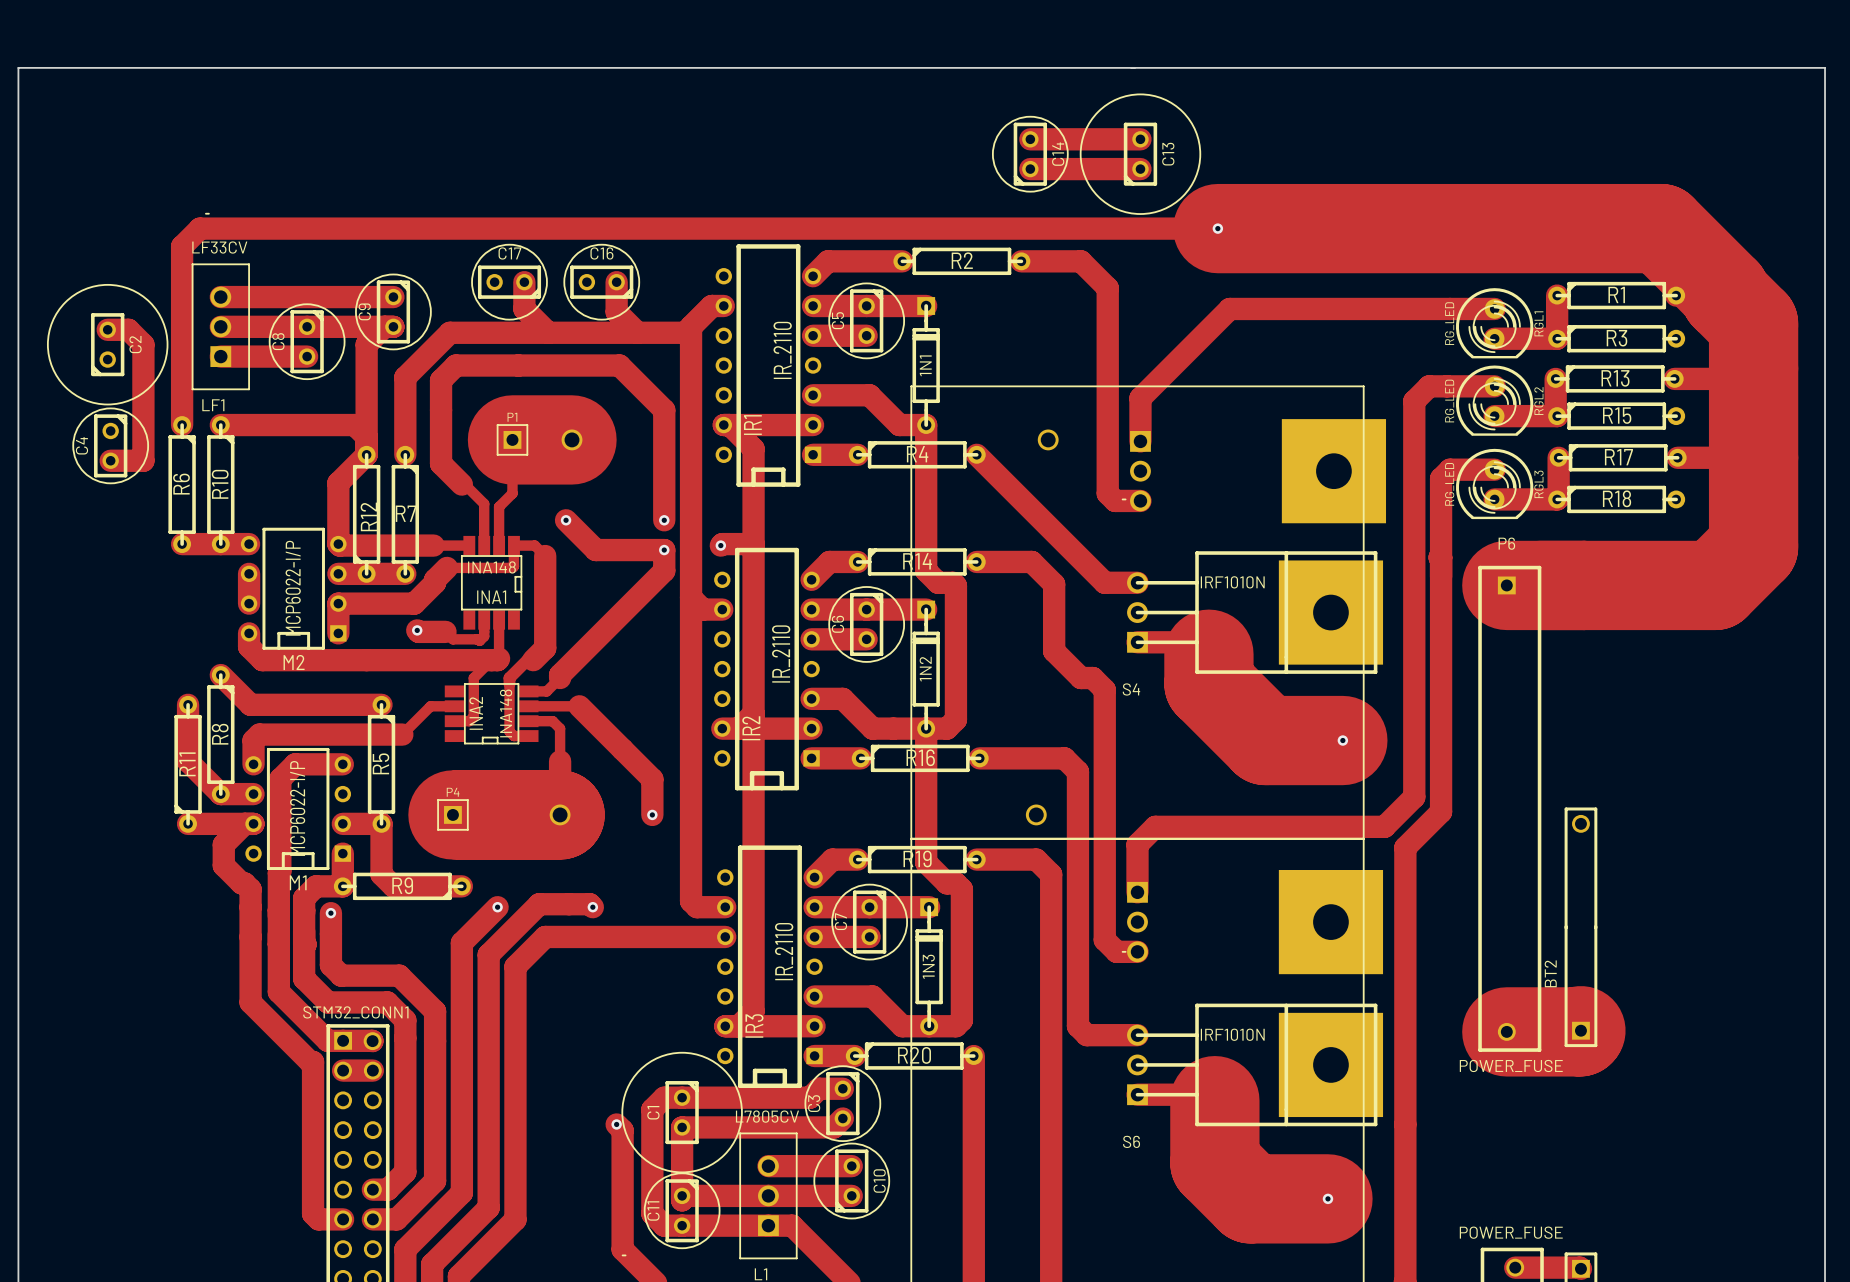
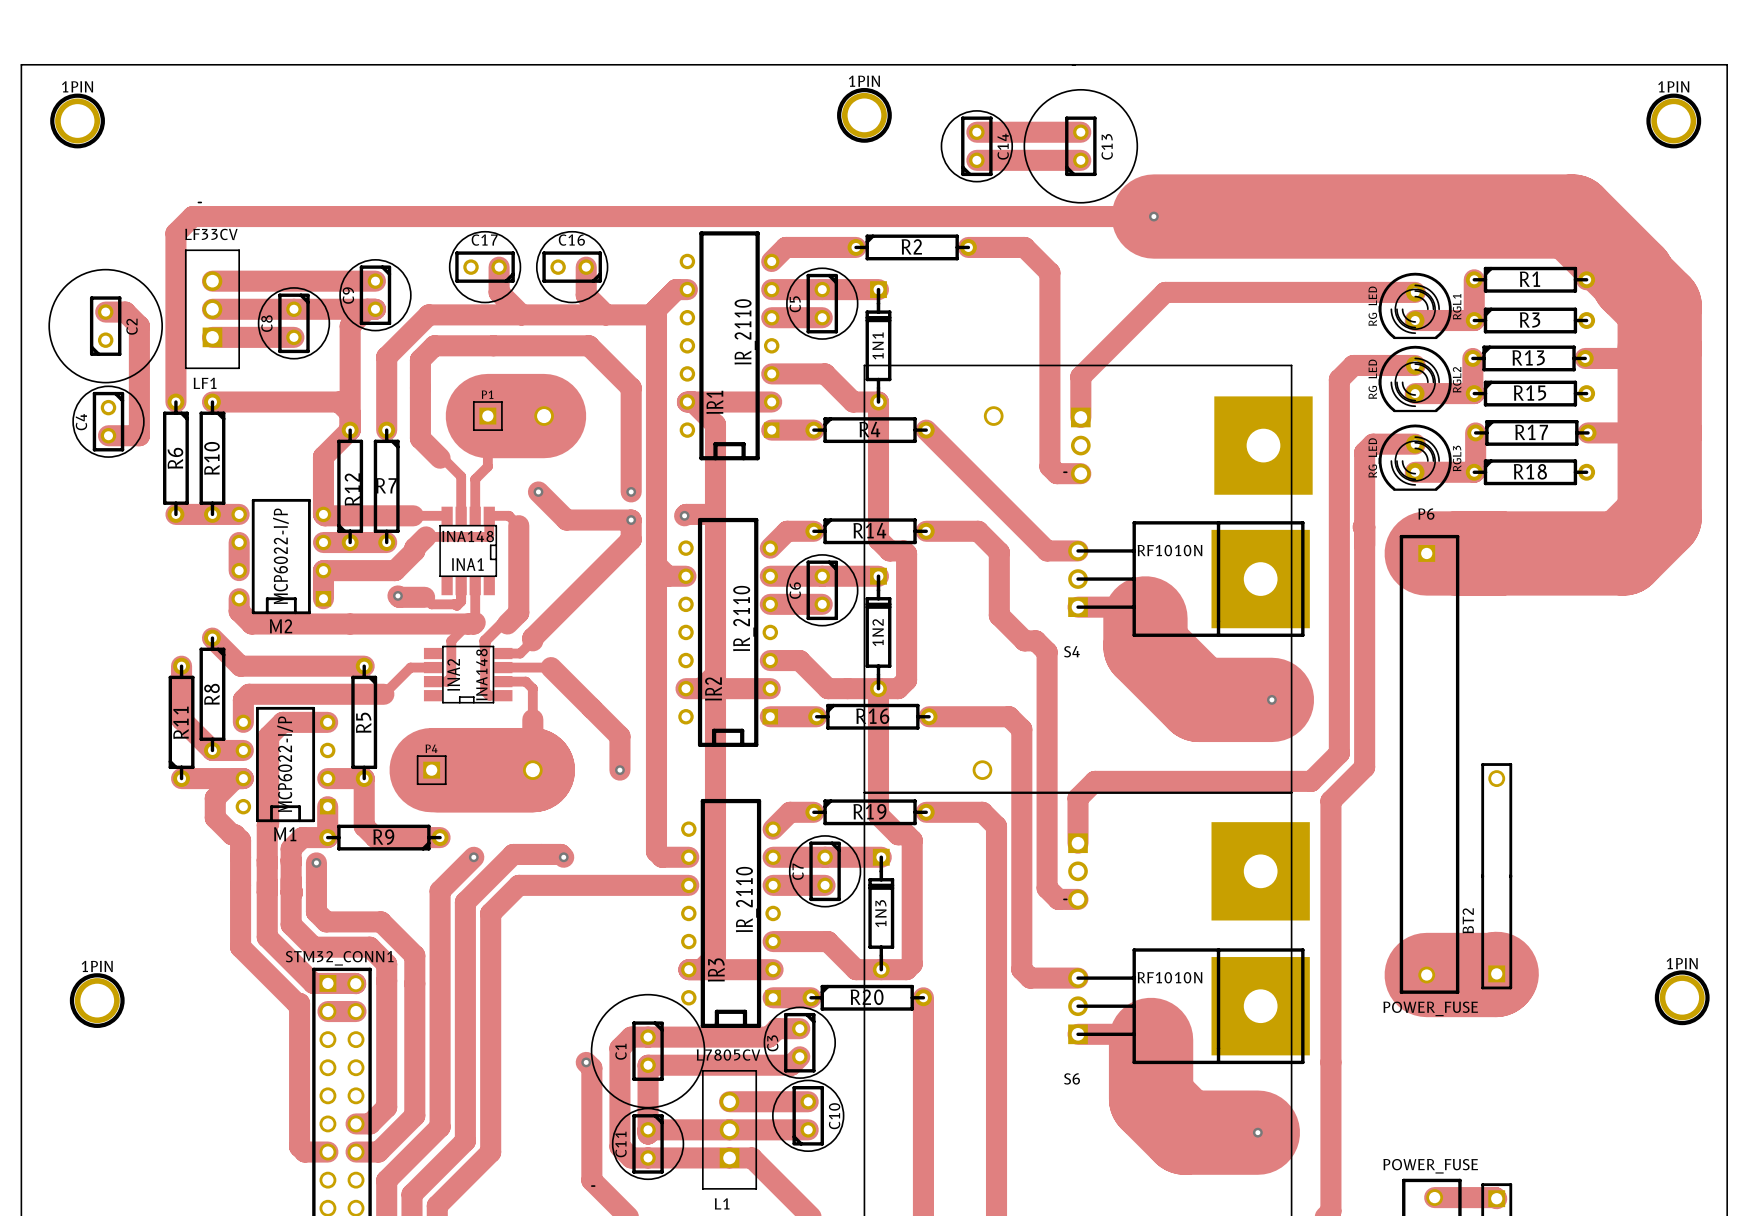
1PIN: none -> (864, 115)
1PIN: none -> (77, 120)
1PIN: none -> (1673, 120)
1PIN: none -> (1682, 997)
1PIN: none -> (97, 1000)

